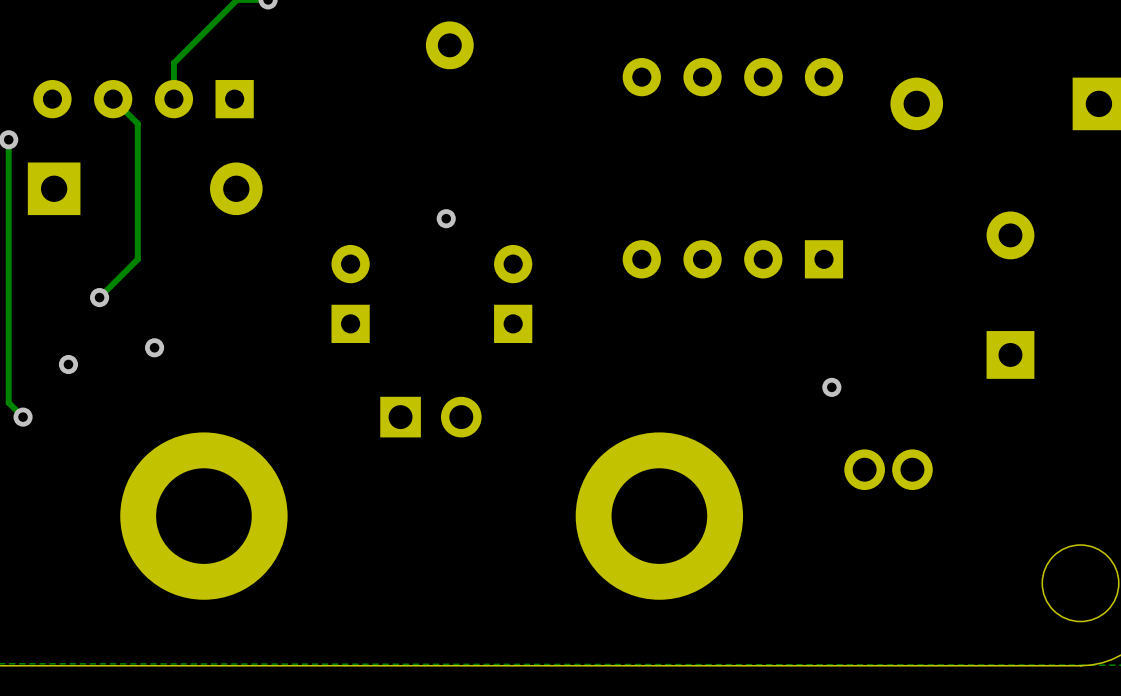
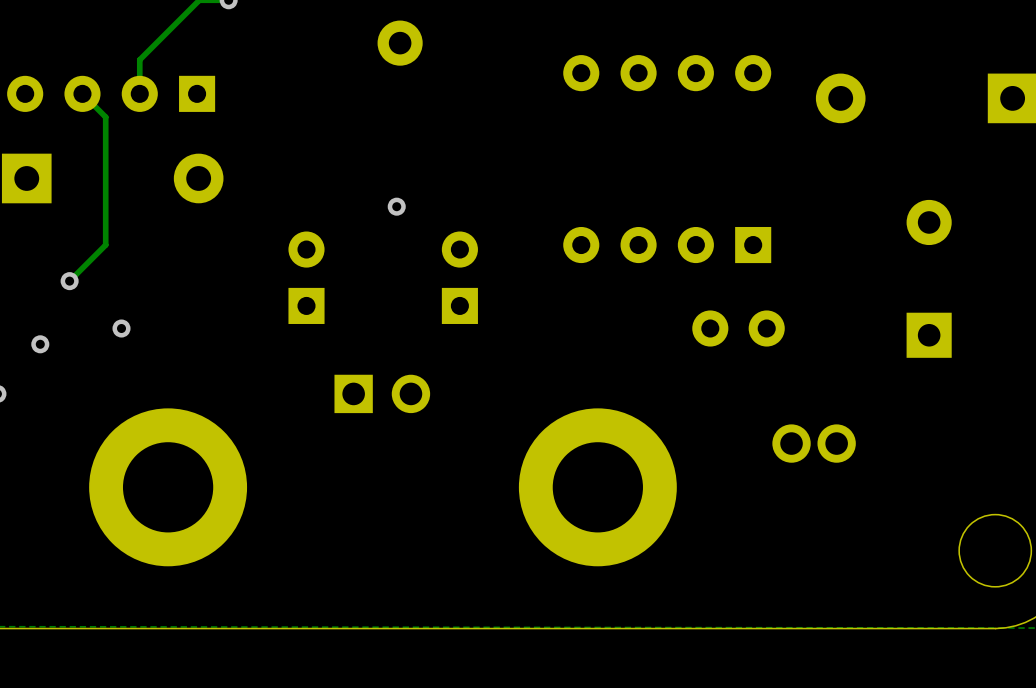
part: none -> (738, 328)
via: (831, 387) -> none

